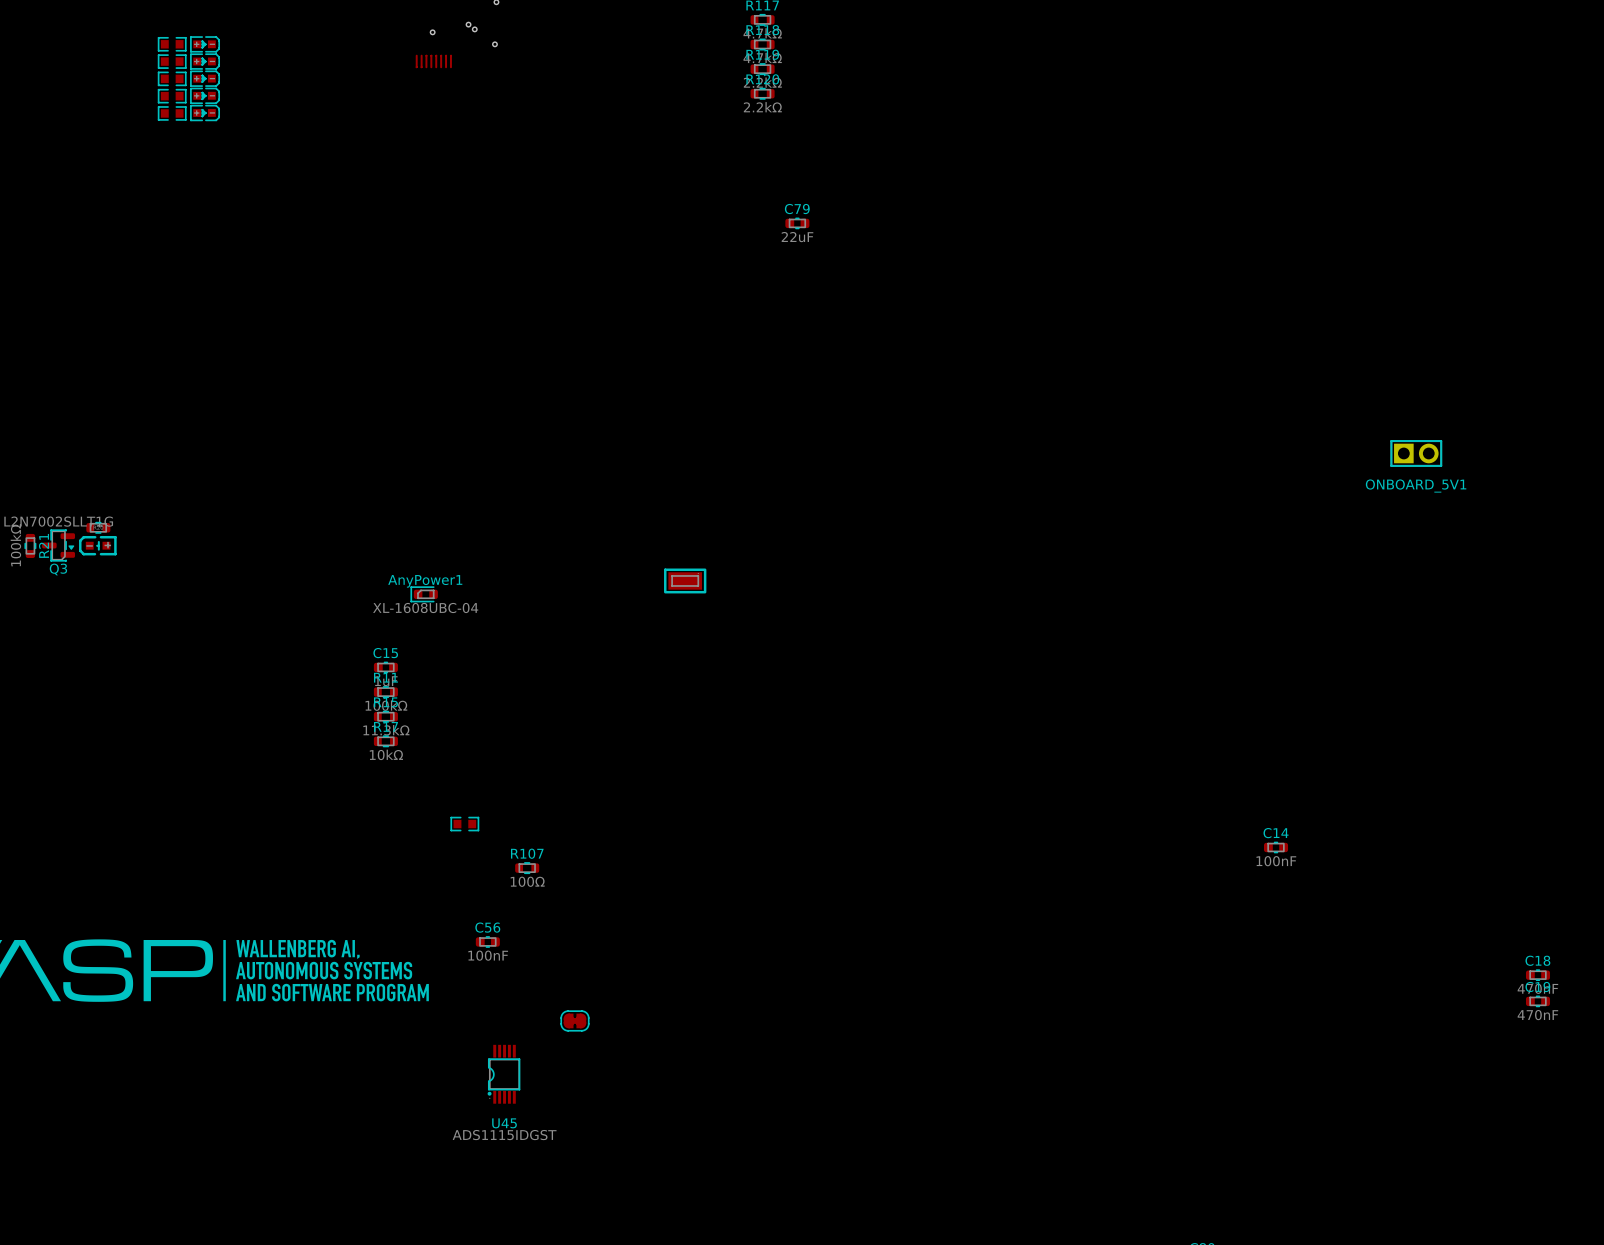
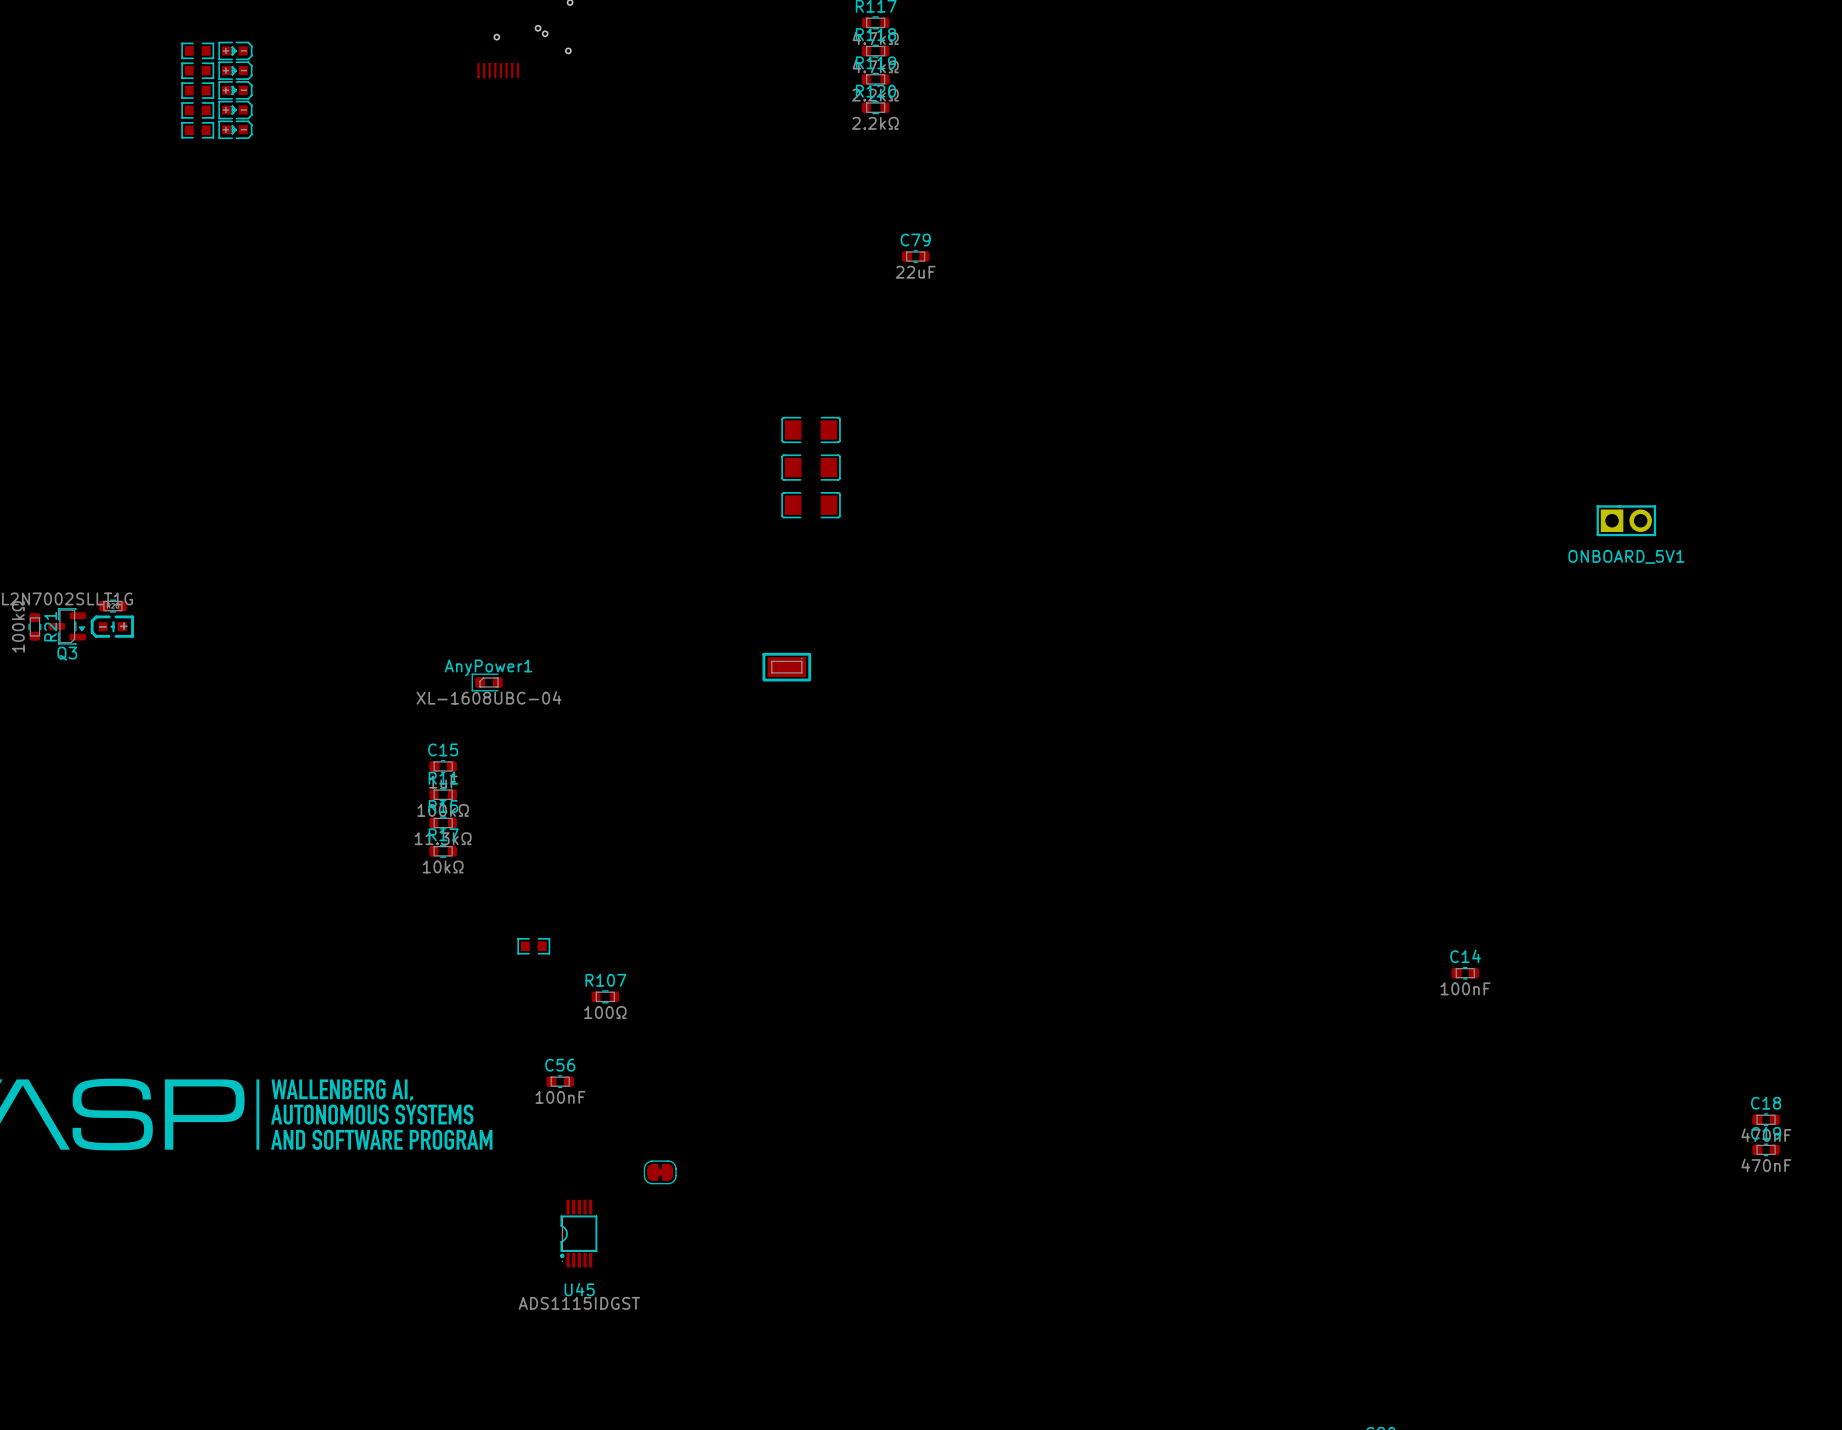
part: none -> (811, 429)
part: none -> (811, 467)
part: none -> (811, 505)

